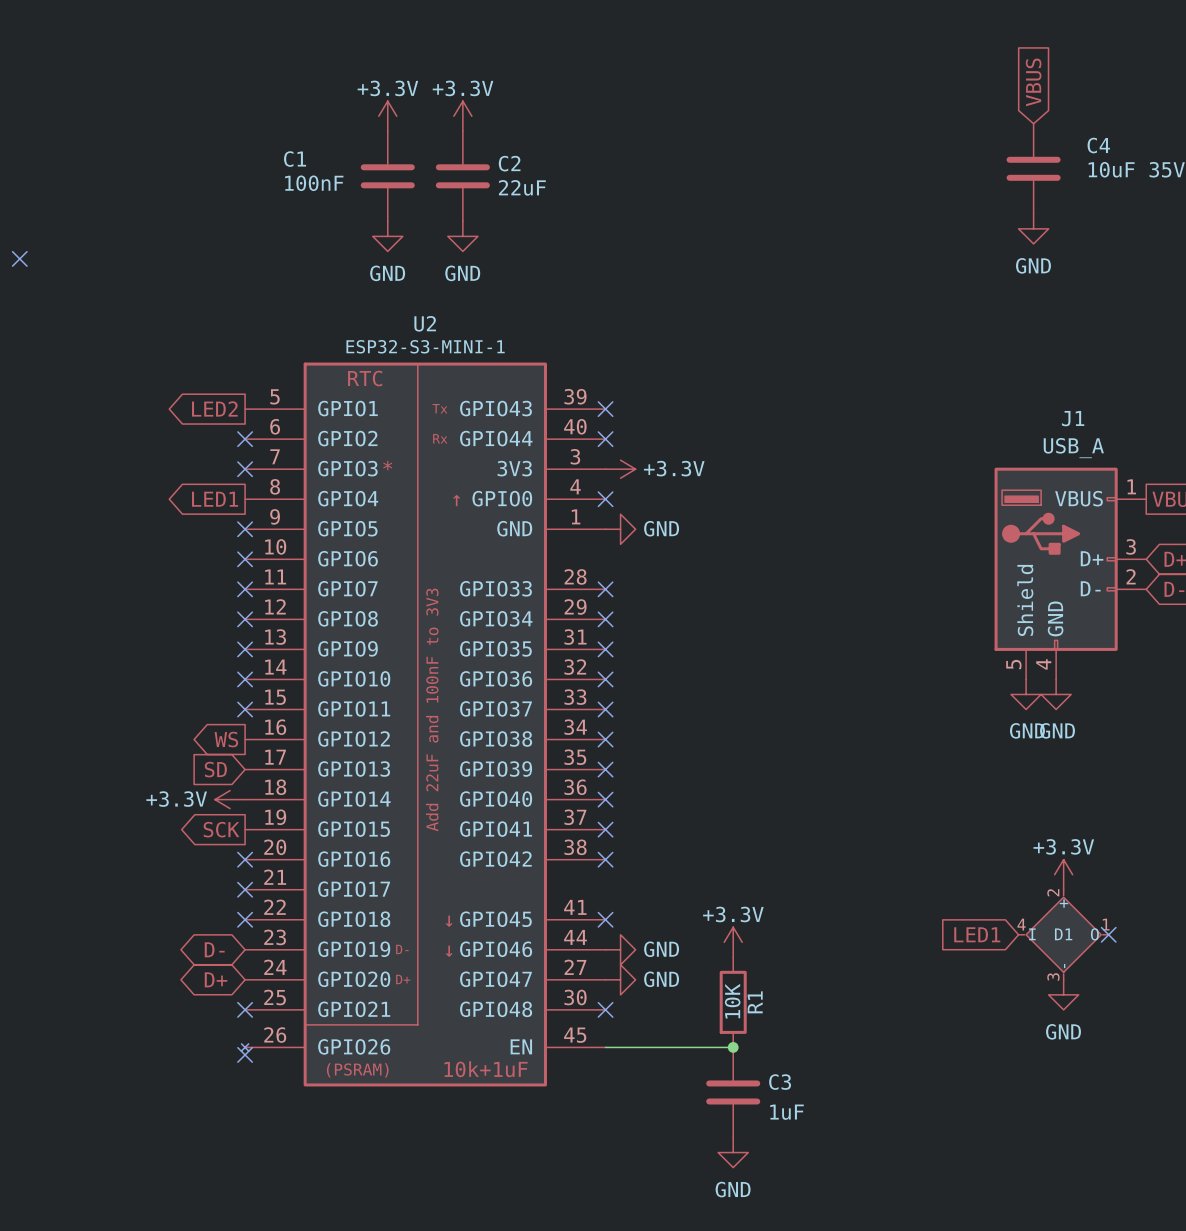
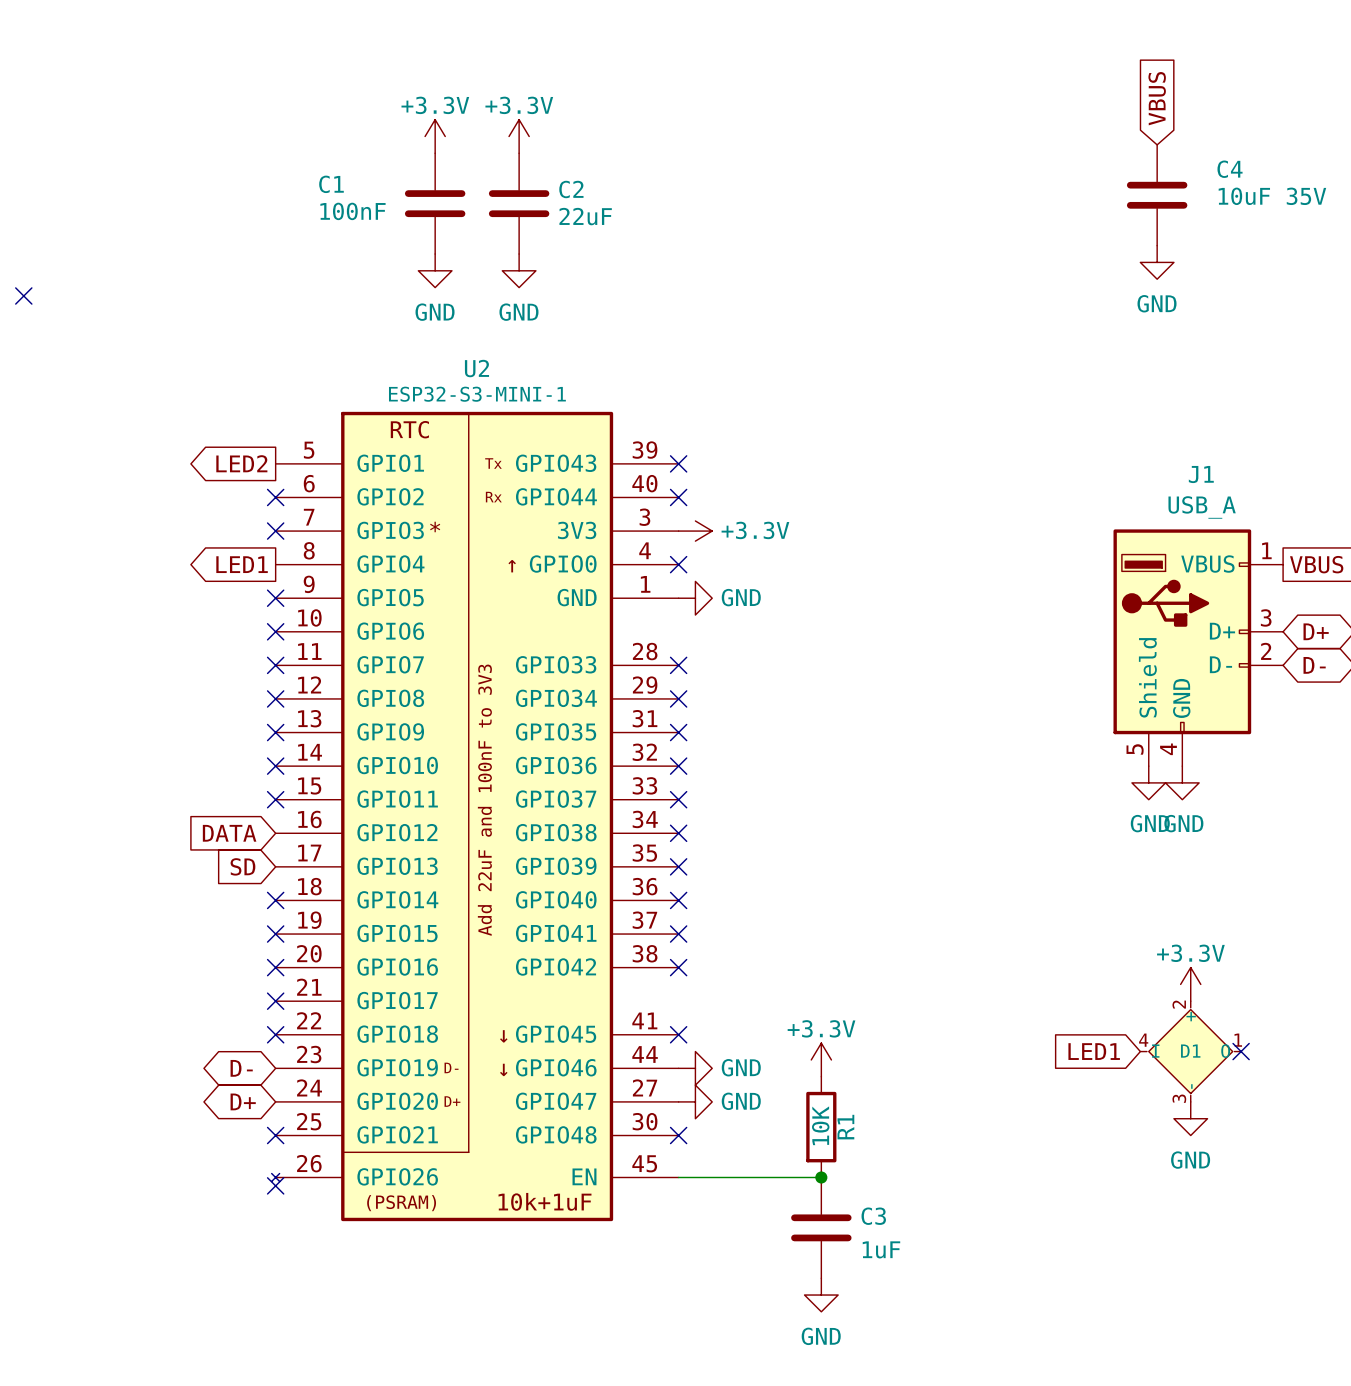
global label shape: output (226, 739) -> input (229, 833)
global label: WS (226, 739) -> DATA (229, 833)
power symbol: +3.3V (230, 799) -> none
no-connect mark: none -> (275, 900)
global label: SCK (221, 829) -> none
no-connect mark: none -> (275, 934)

